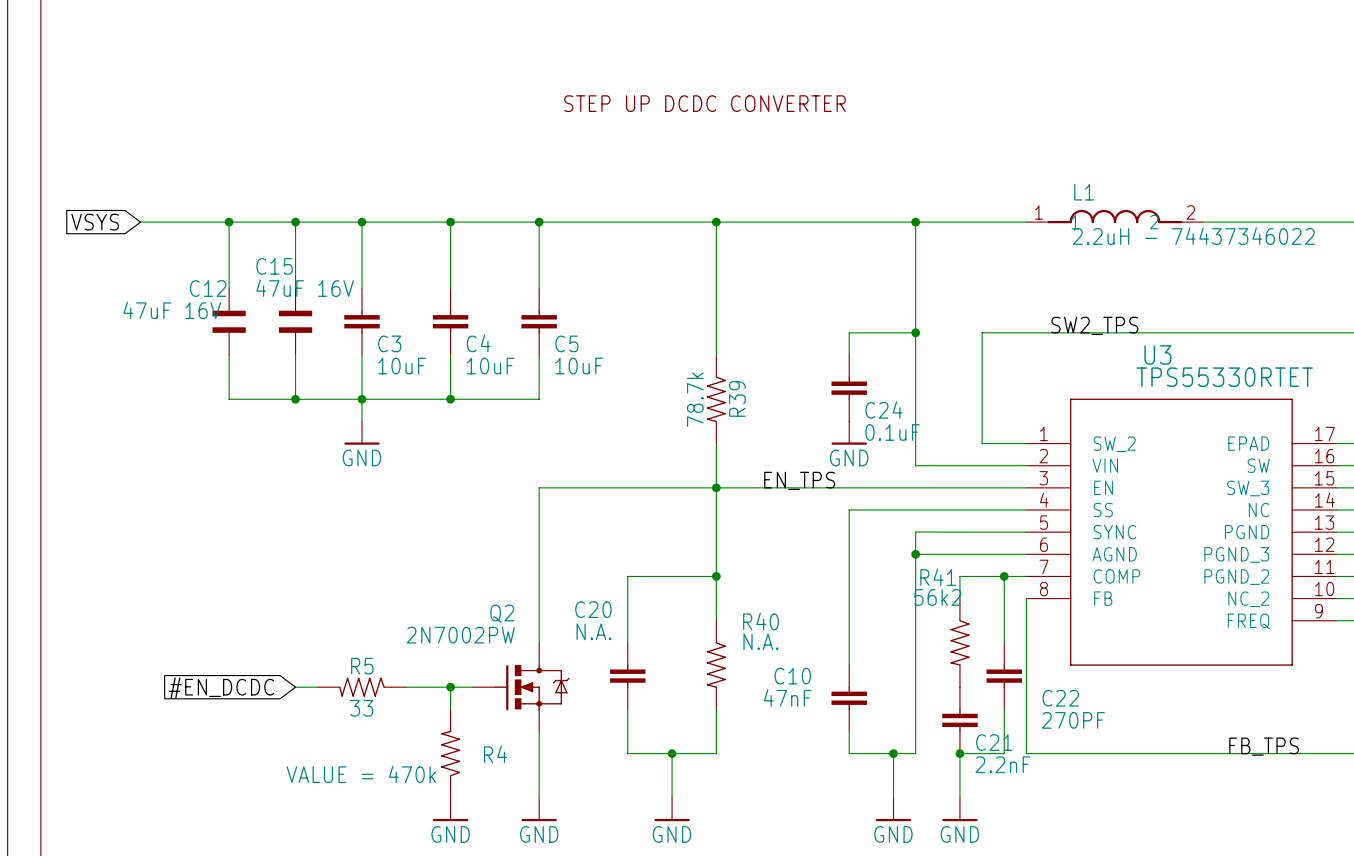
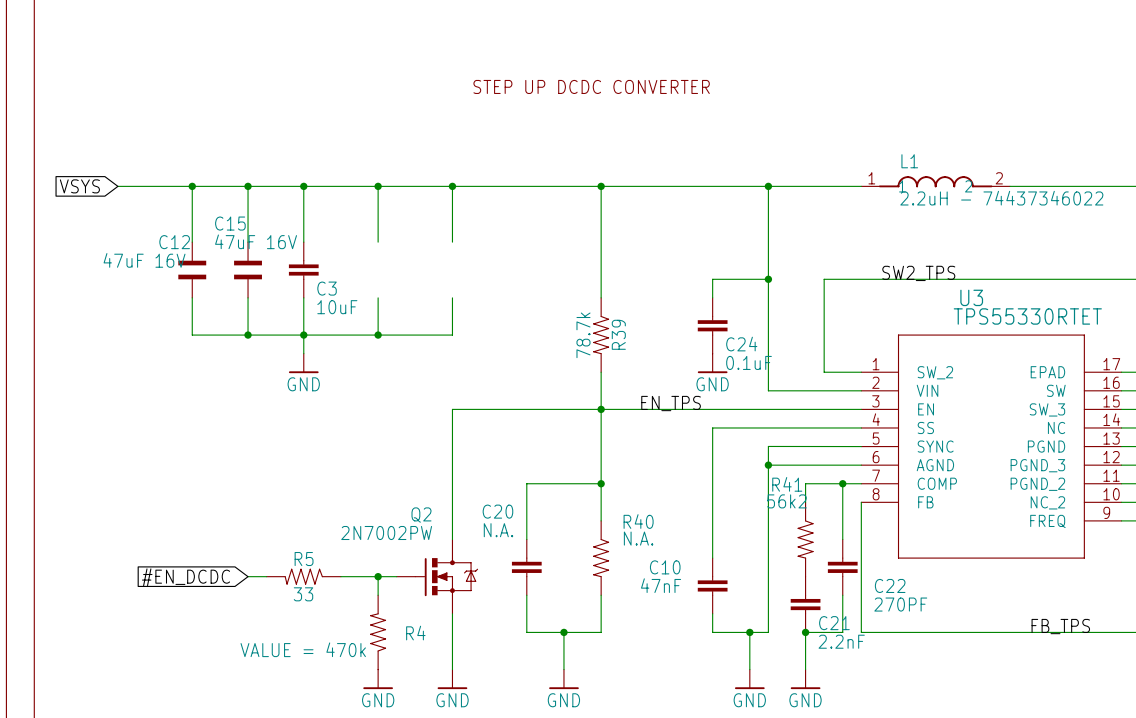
C4: 10uF (450, 321) -> none
C5: 10uF (539, 321) -> none

